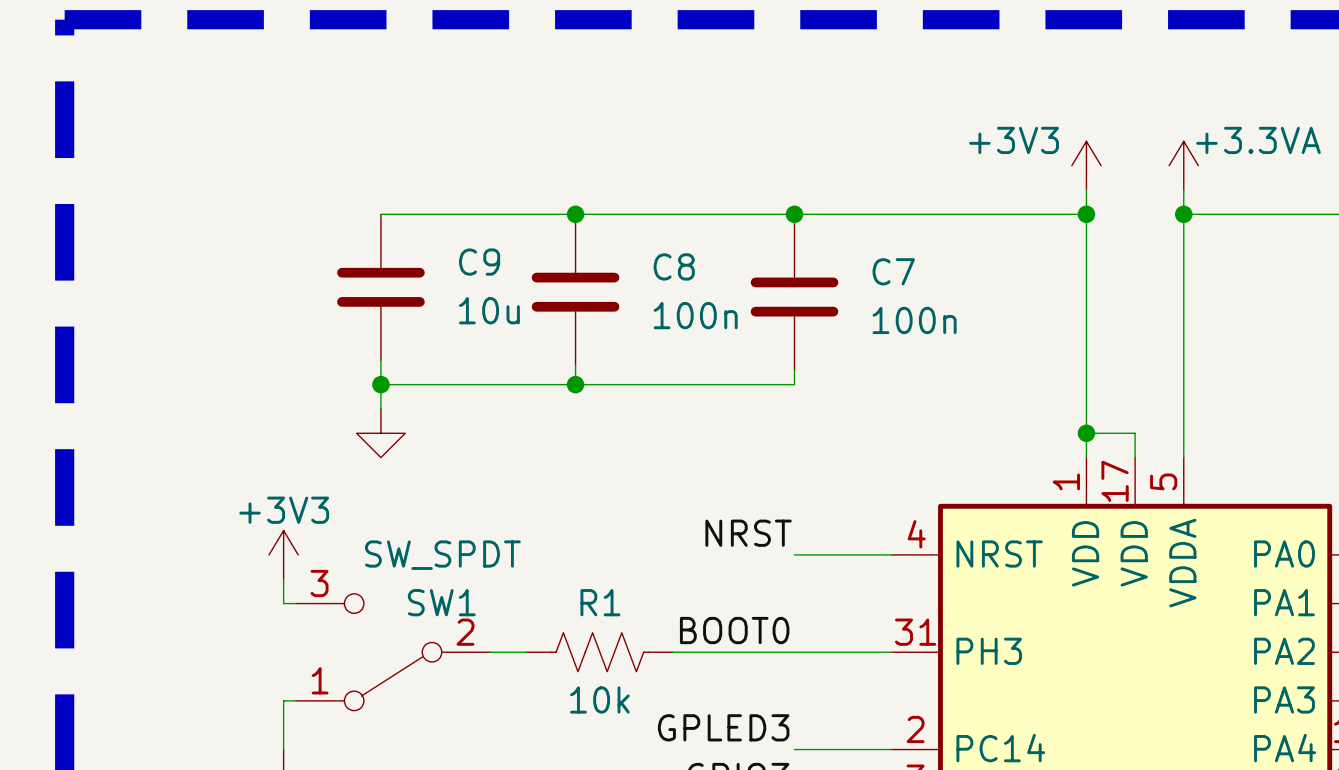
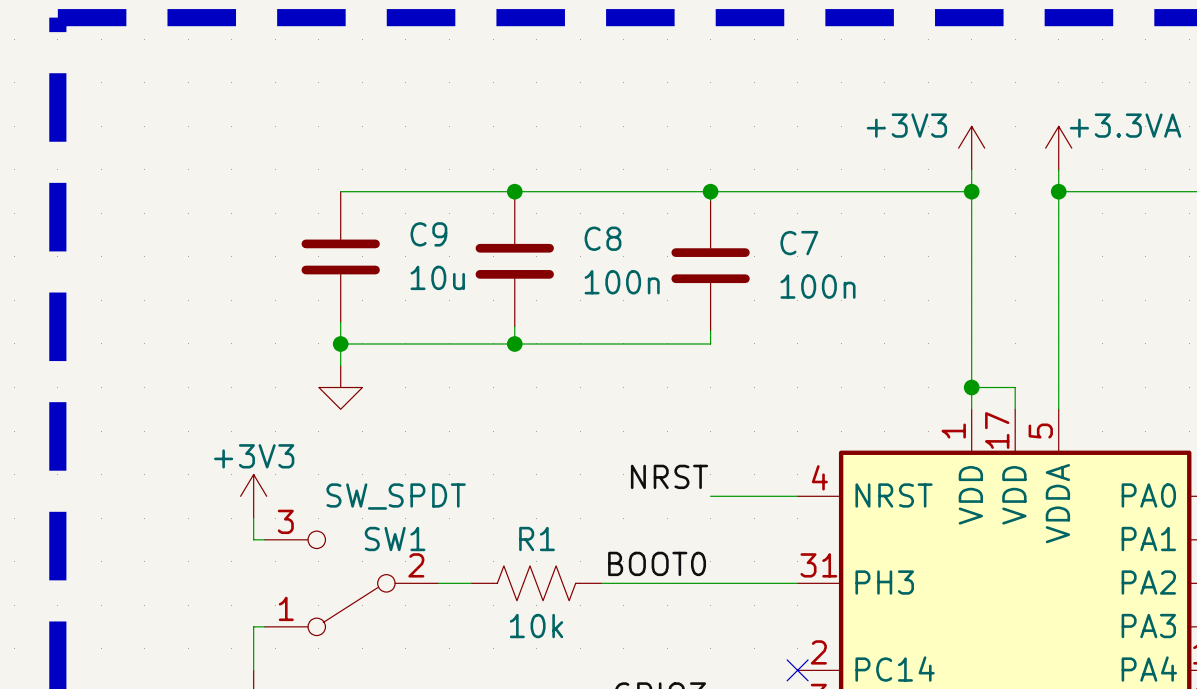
label: GPLED3 (723, 727) -> none
wire: (794, 749) (891, 749) -> none
no-connect mark: none -> (797, 670)

